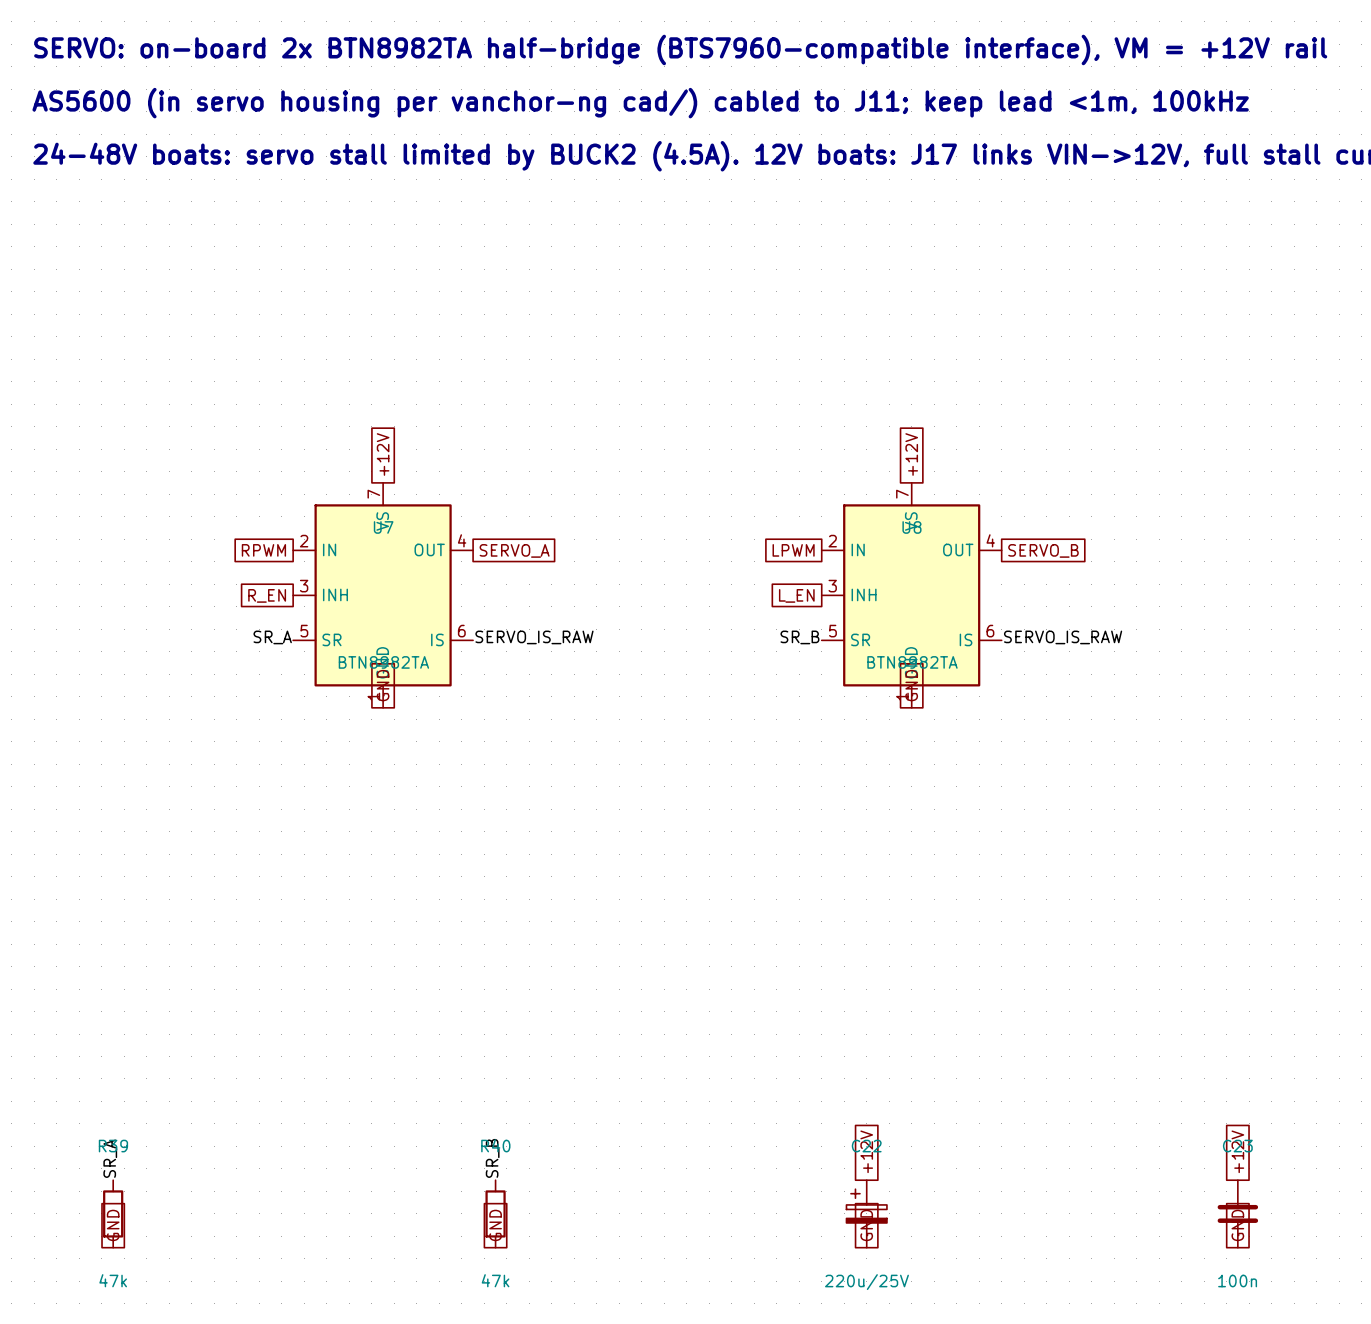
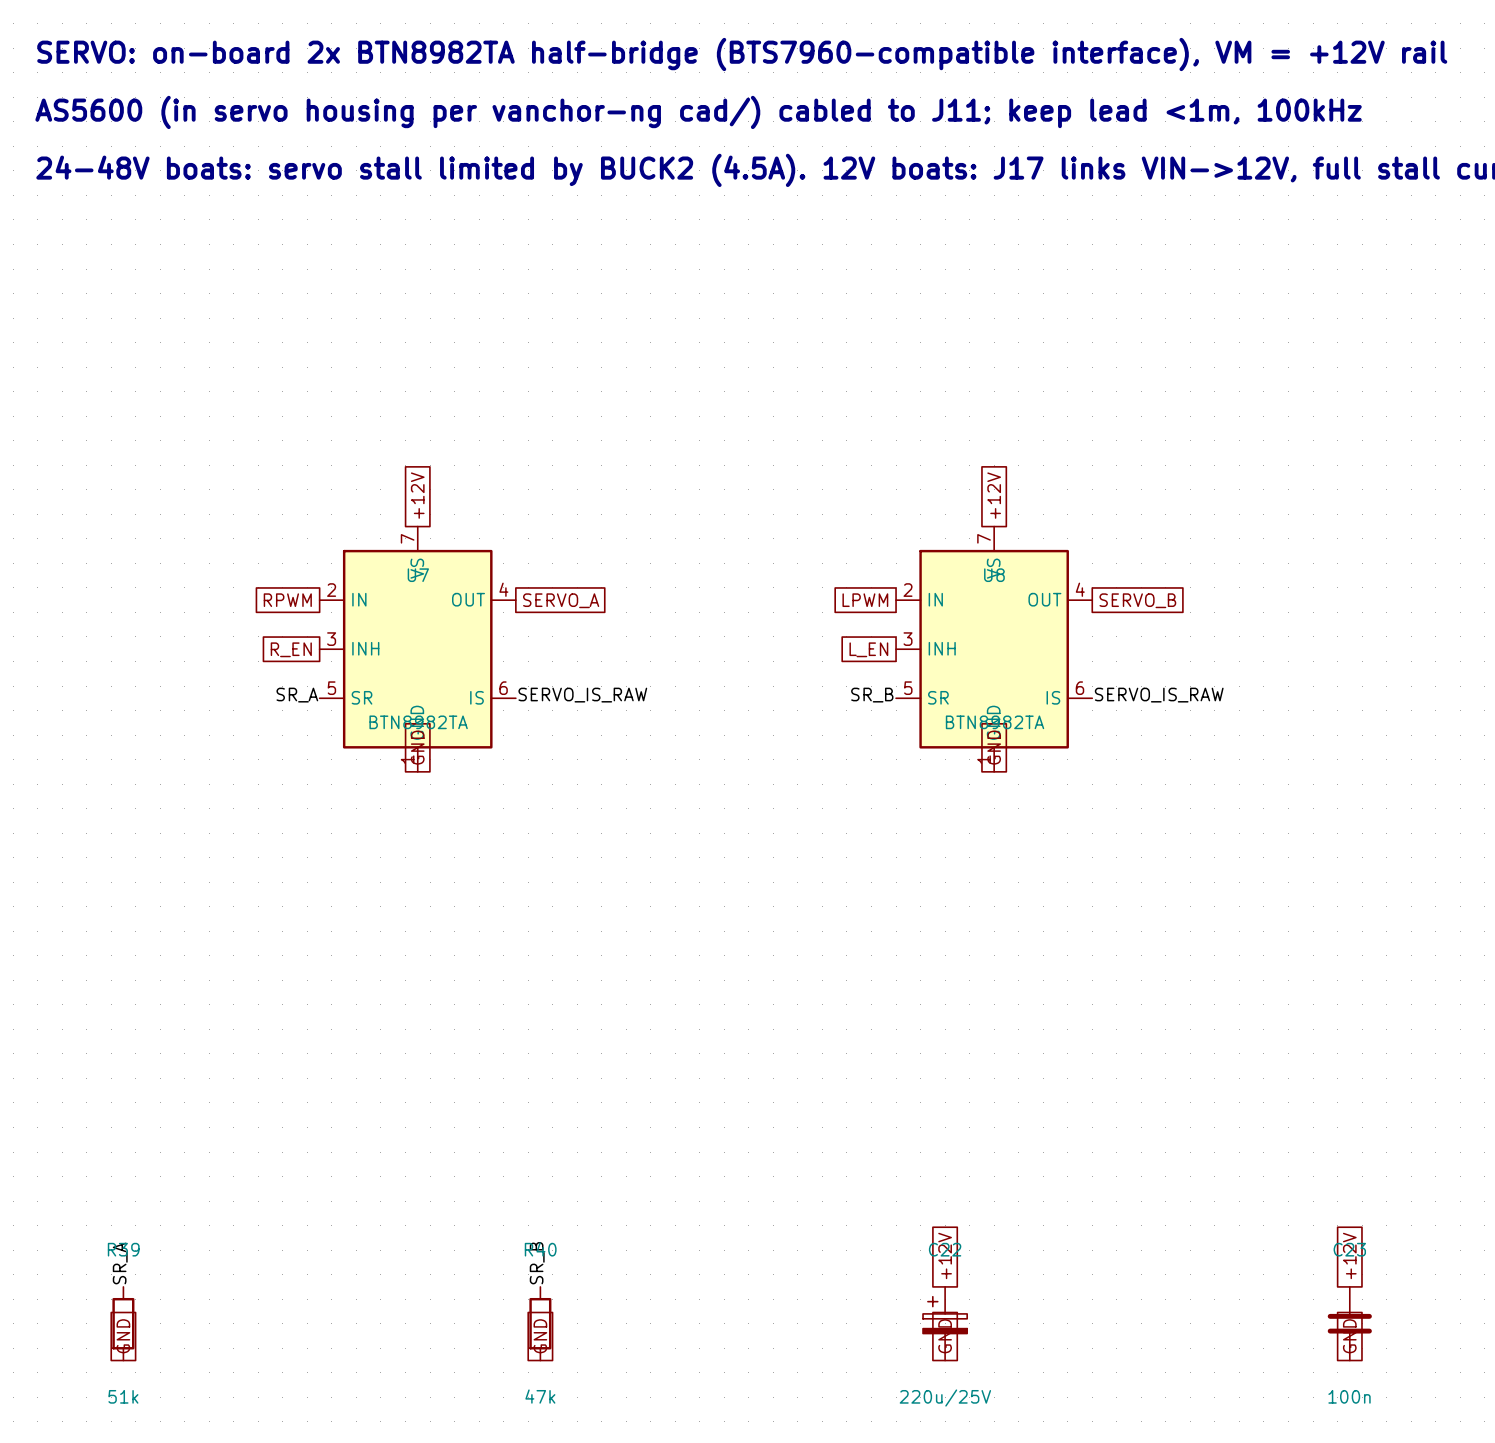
R39 value: 47k (113, 1280) -> 51k (123, 1396)

